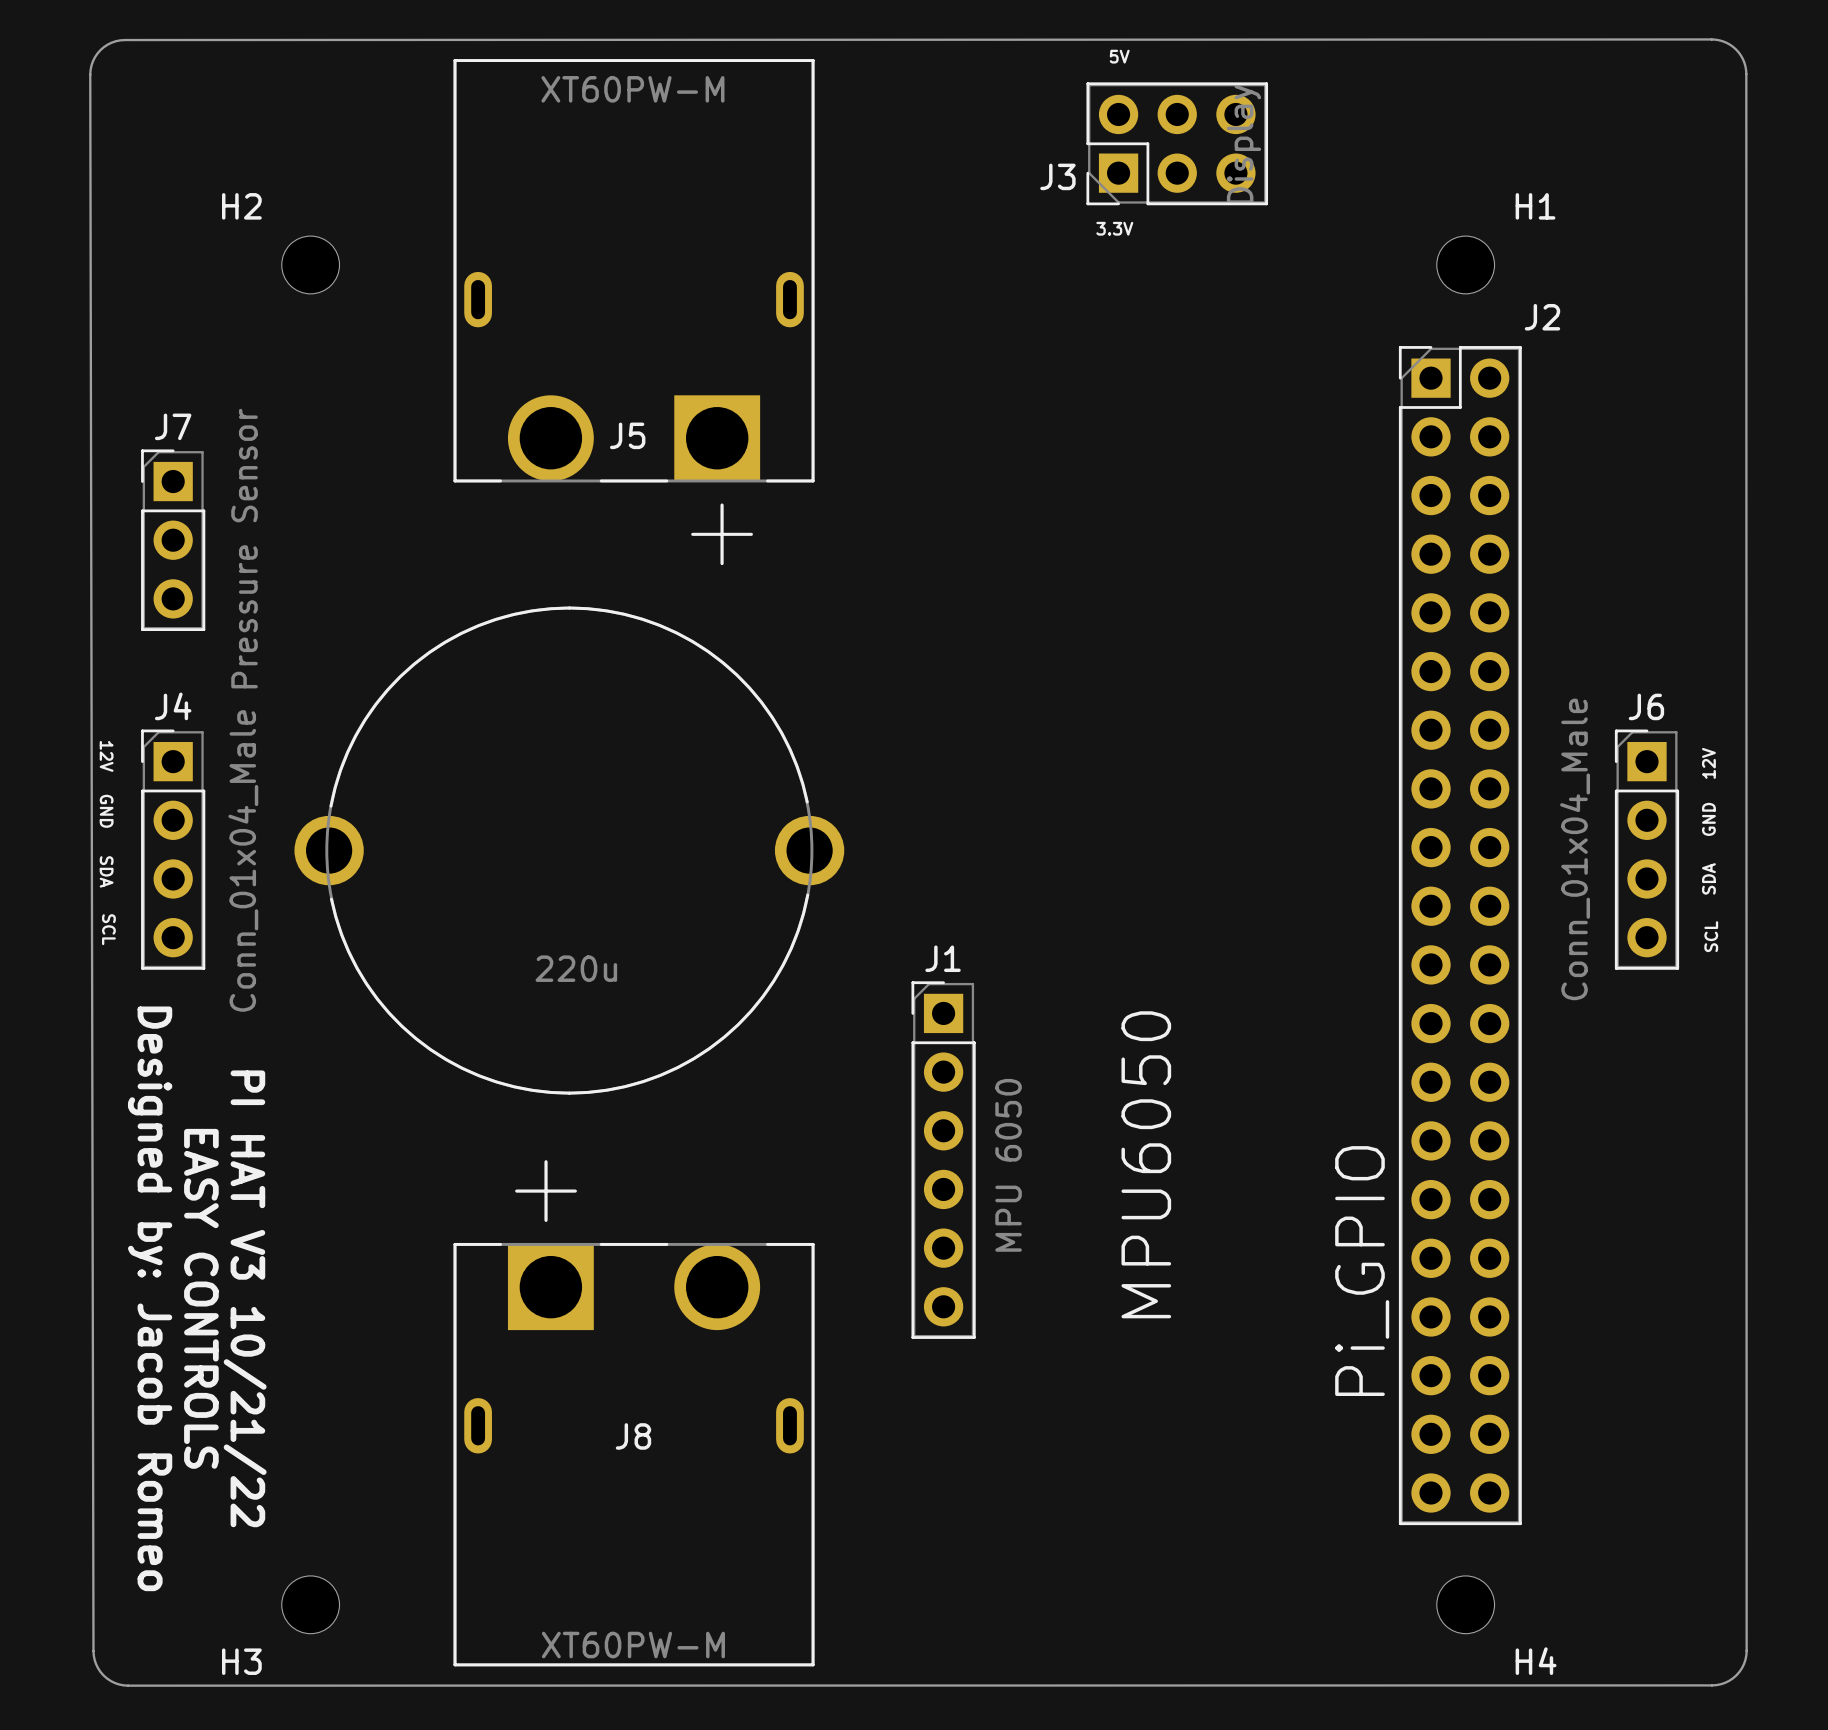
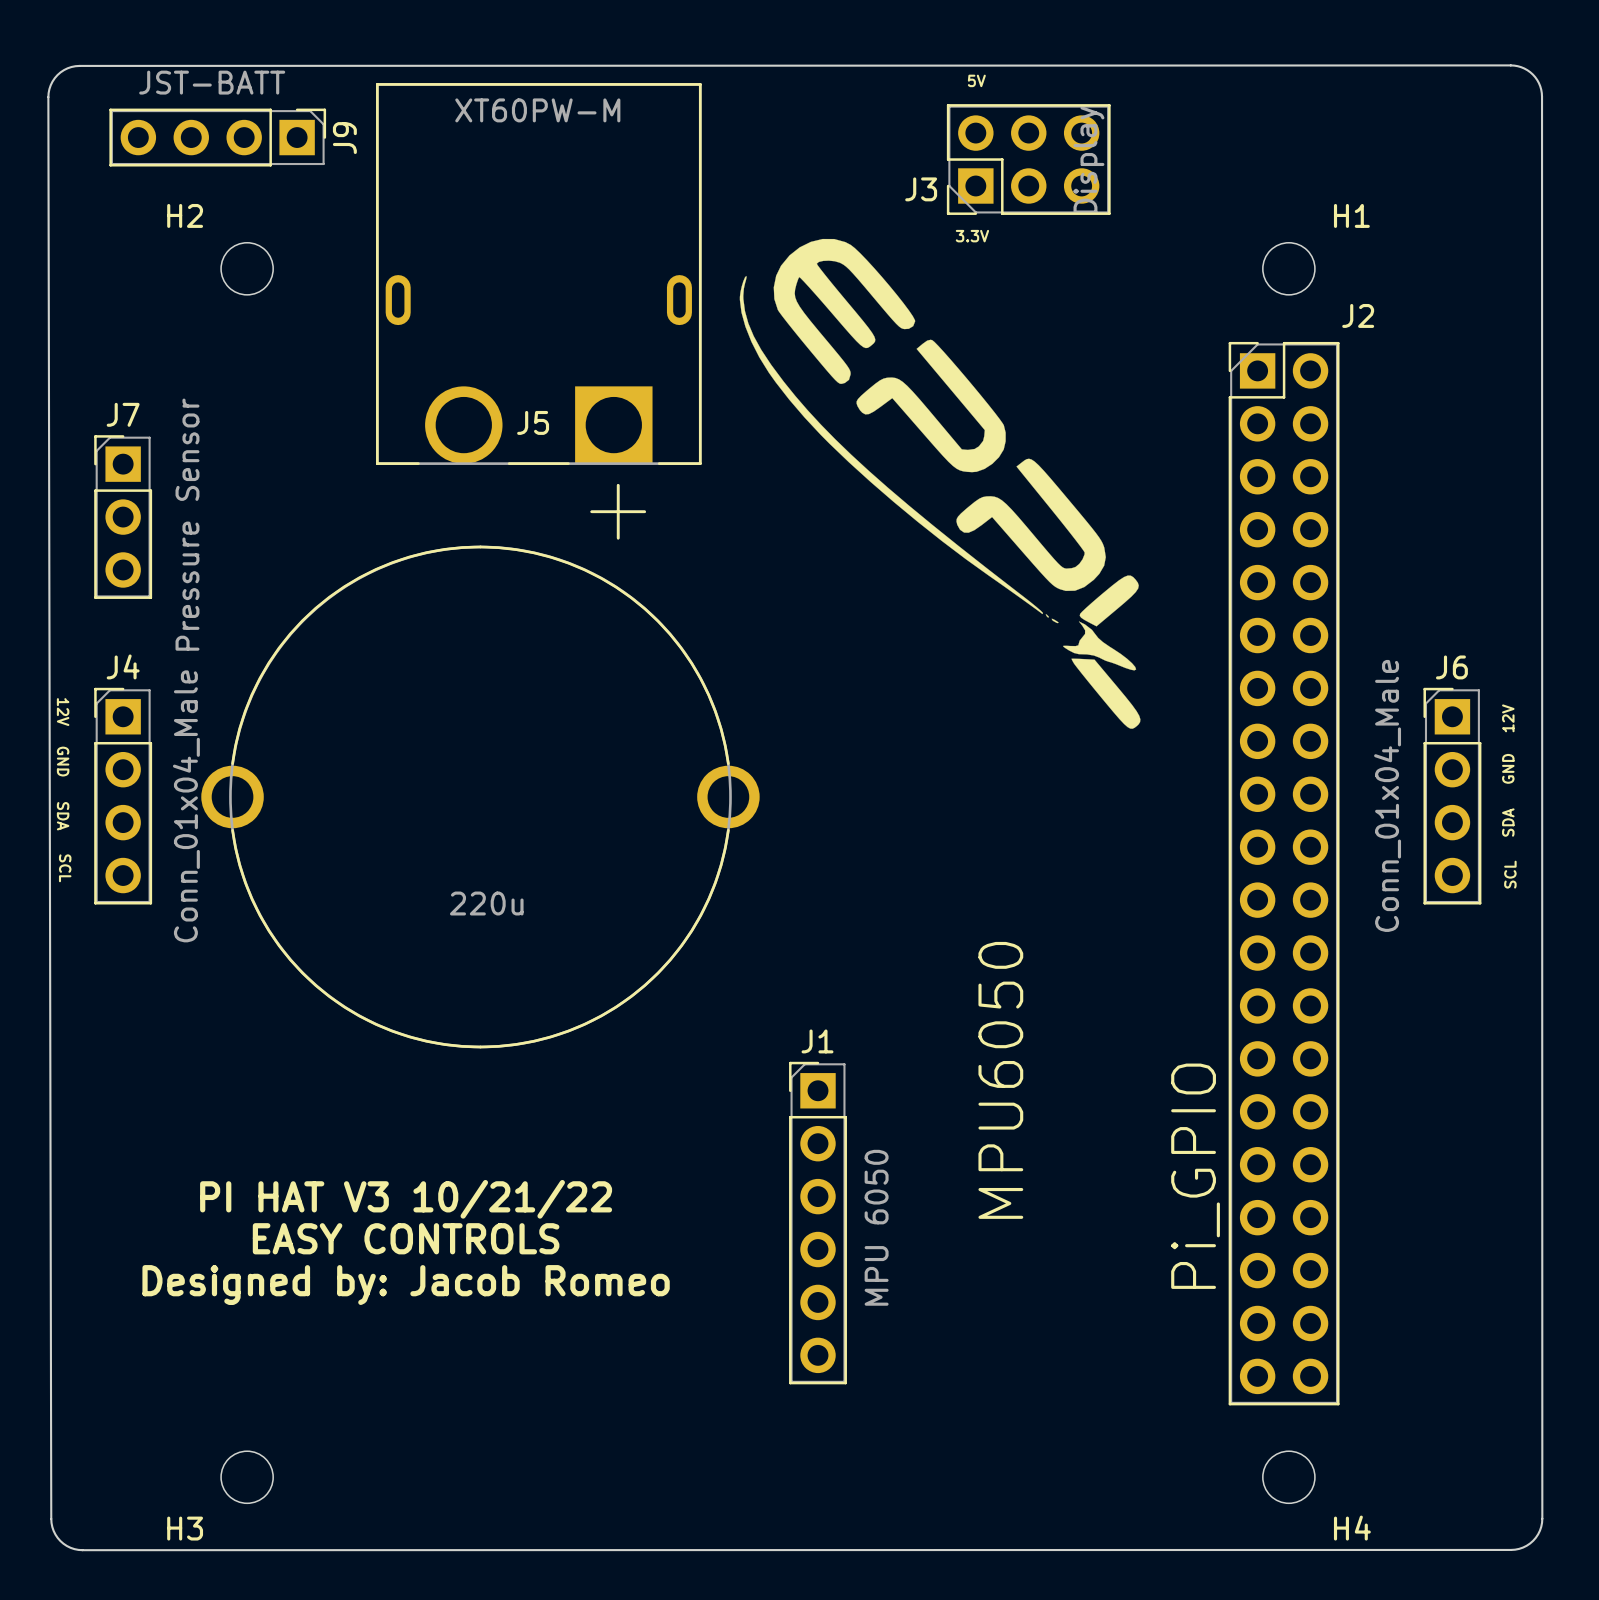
J9: none -> JST-BATT (217, 137)
drawing: none -> [739, 238, 1141, 729]
part footprint: [294, 606, 845, 1095] -> [201, 545, 760, 1049]
J1 position: (943, 1160) -> (818, 1223)
text rotation: 0° (150, 1298) -> 90° counterclockwise (406, 1285)
text rotation: 0° (201, 1298) -> 90° counterclockwise (406, 1238)
text rotation: 0° (245, 1298) -> 90° counterclockwise (406, 1199)
J8: XT60PW-M (634, 1413) -> none

